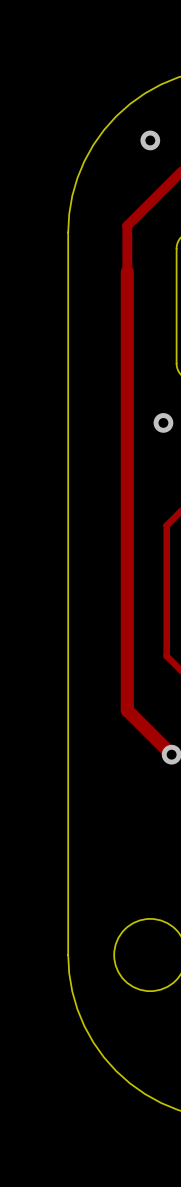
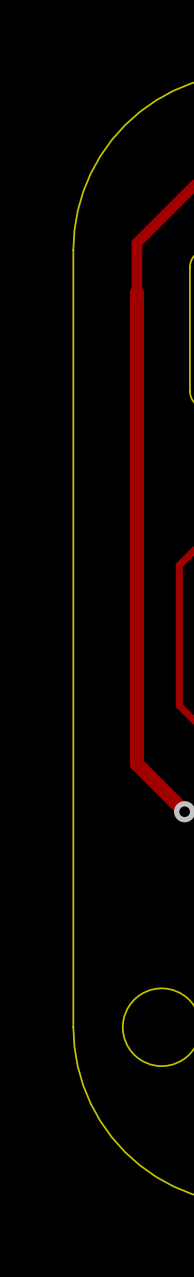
via: (150, 140) -> none
via: (163, 422) -> none

